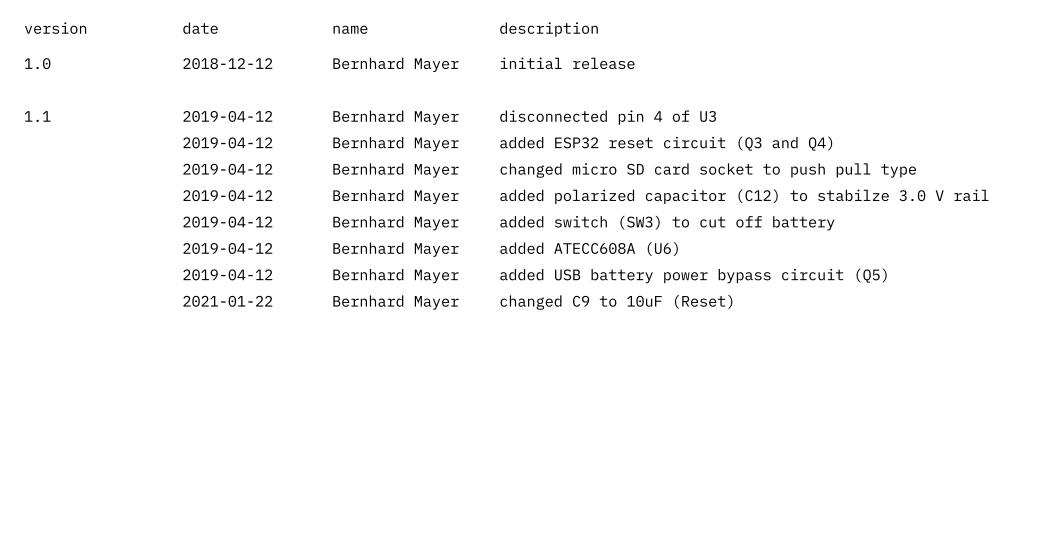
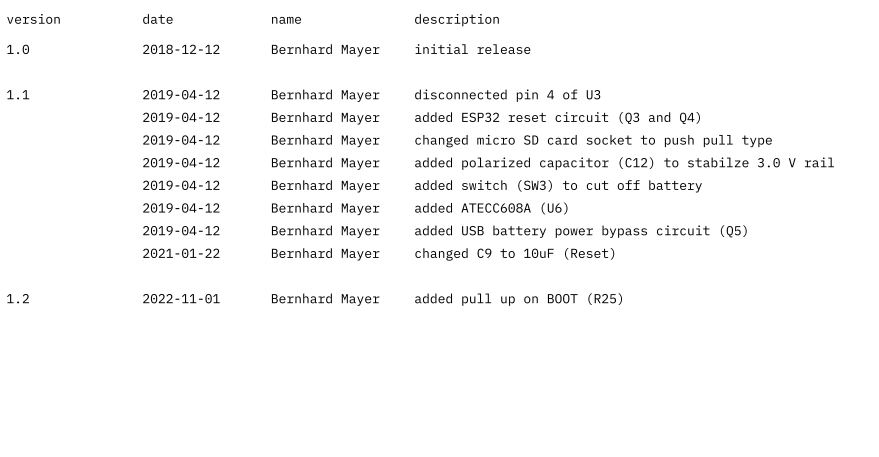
text: none -> 1.2 (18, 298)
text: none -> 2022-11-01 (181, 298)
text: none -> Bernhard Mayer (325, 299)
text: none -> added pull up on BOOT (R25) (518, 299)

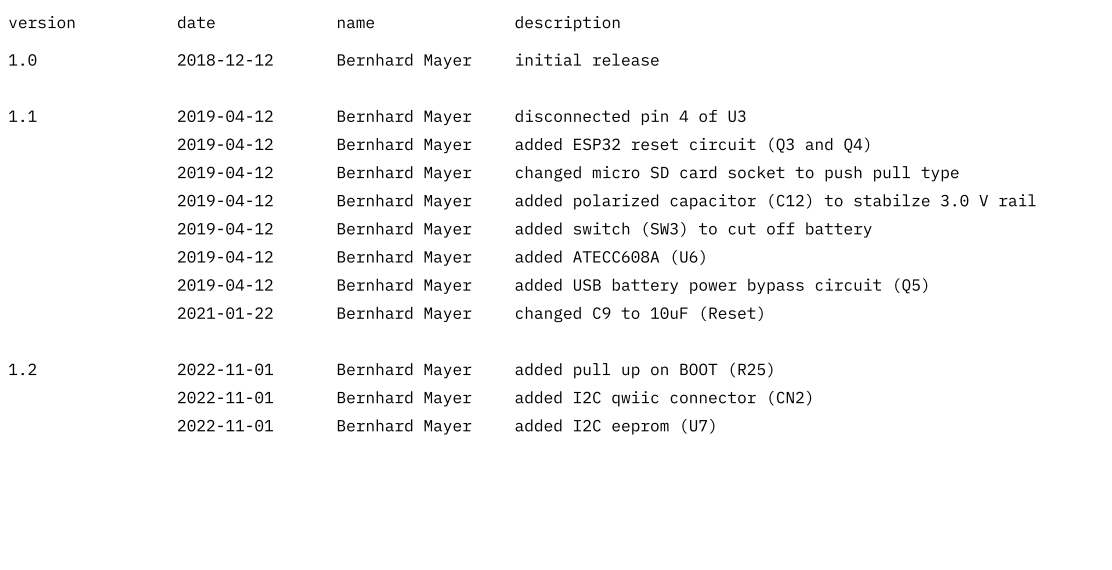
text: none -> 2022-11-01 (225, 397)
text: none -> Bernhard Mayer (404, 398)
text: none -> added I2C qwiic connector (CN2) (663, 398)
text: none -> 2022-11-01 (225, 425)
text: none -> added I2C eeprom (U7) (615, 426)
text: none -> Bernhard Mayer (404, 426)

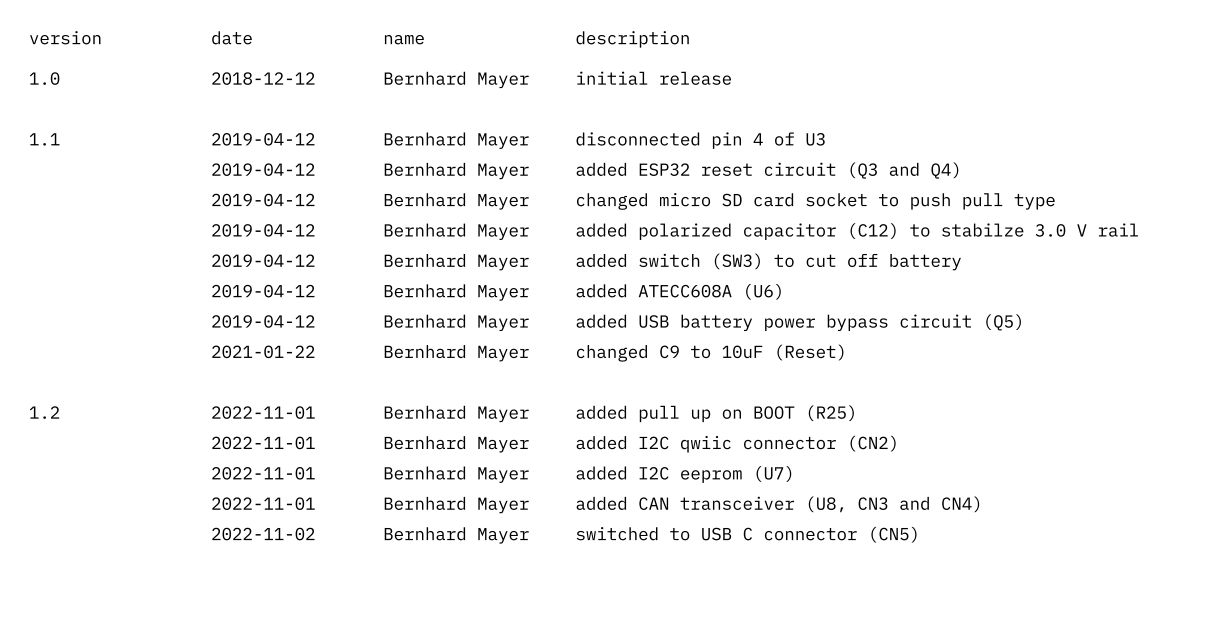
text: none -> 2022-11-01 (263, 503)
text: none -> added CAN transceiver (U8, CN3 and CN4) (777, 504)
text: none -> Bernhard Mayer (456, 505)
text: none -> 2022-11-02 (263, 534)
text: none -> switched to USB C connector (CN5) (746, 534)
text: none -> Bernhard Mayer (456, 535)

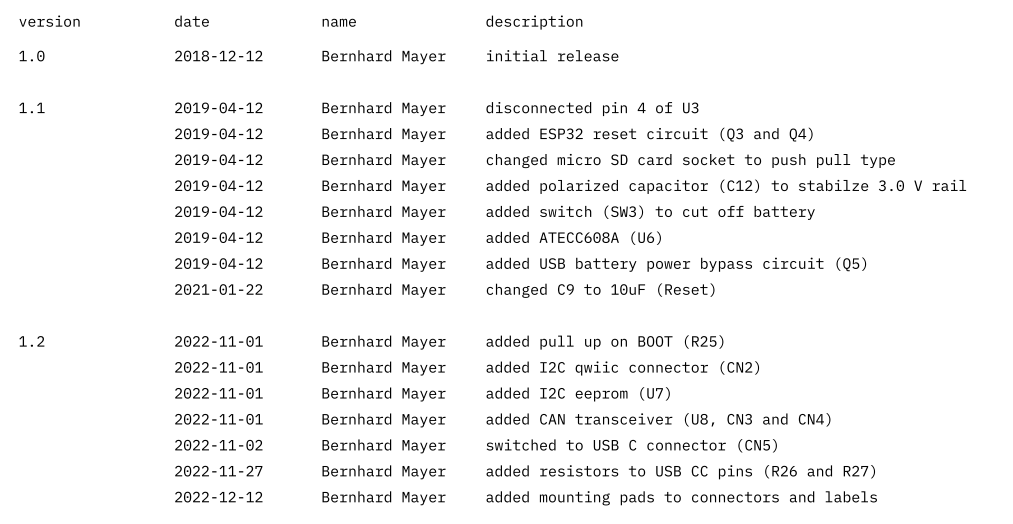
text: none -> 2022-11-27 (218, 471)
text: none -> Bernhard Mayer (384, 472)
text: none -> added resistors to USB CC pins (R26 and R27) (680, 472)
text: none -> 2022-12-12 (218, 497)
text: none -> Bernhard Mayer (384, 498)
text: none -> added mounting pads to connectors and labels (681, 498)

